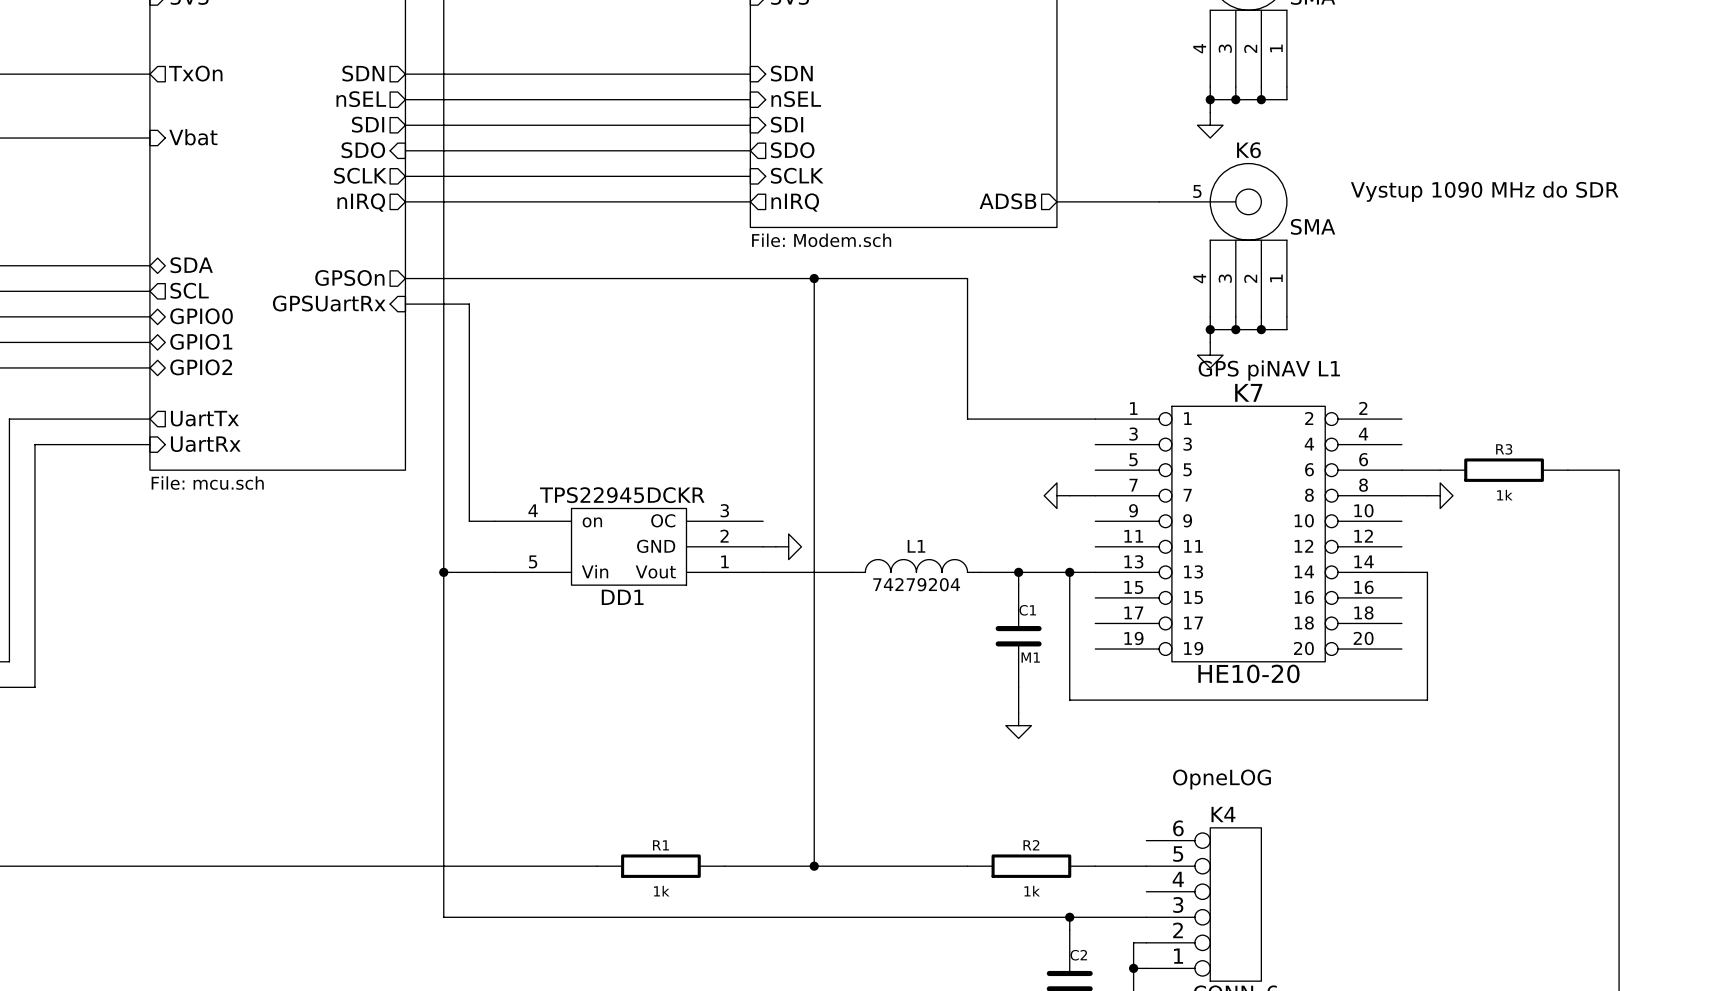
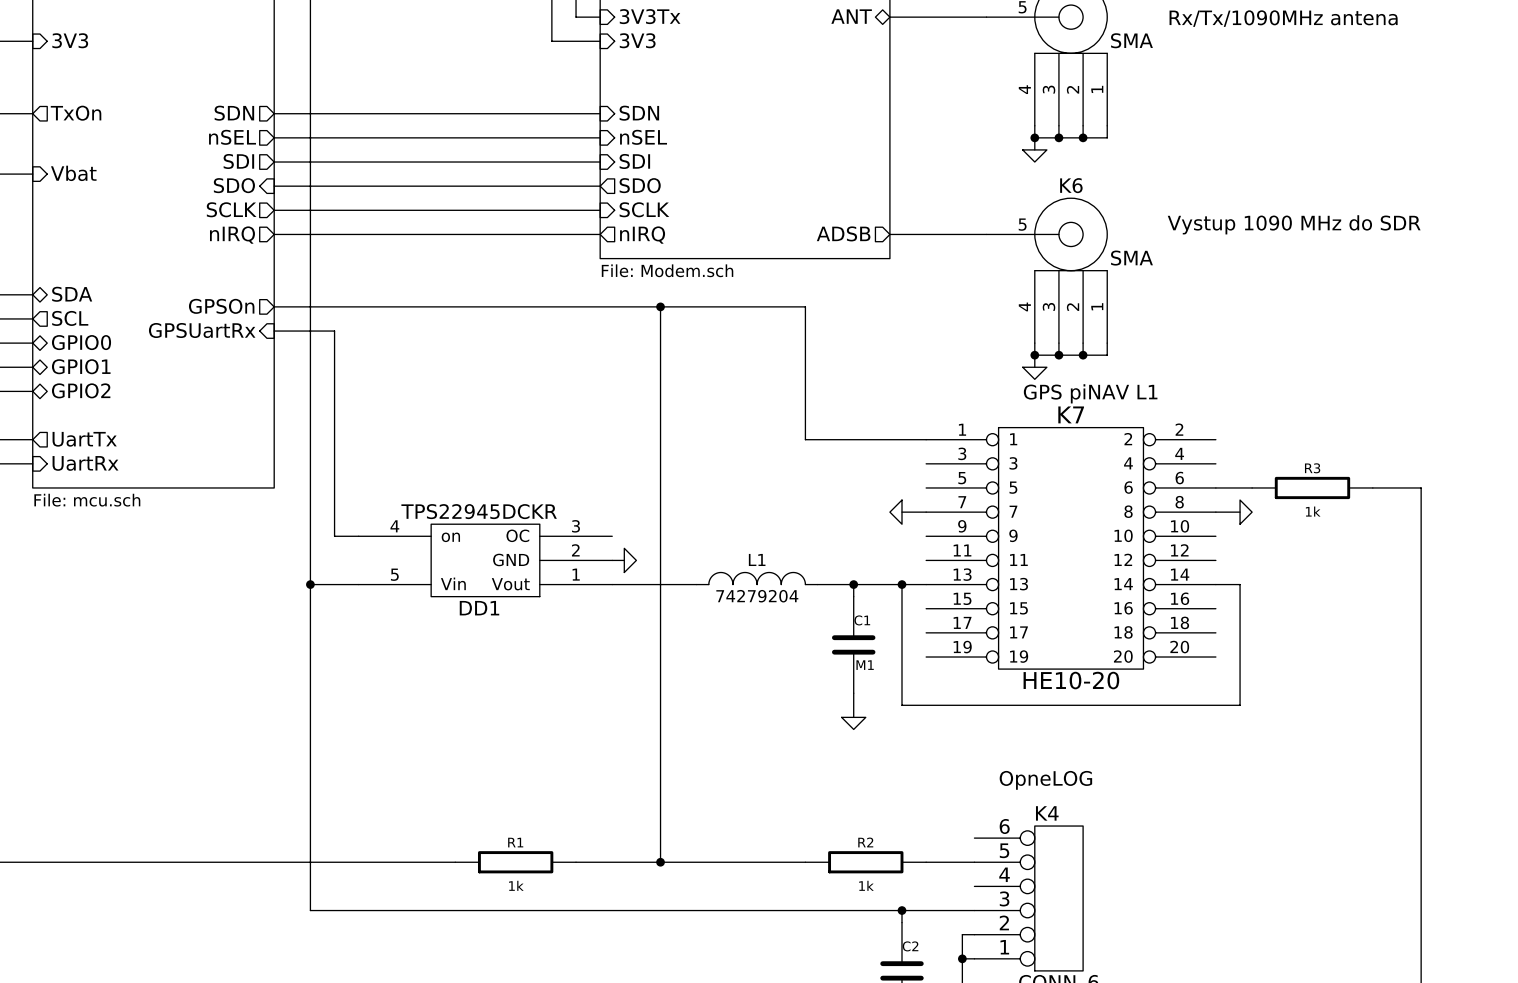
power symbol shape: [1197, 112, 1224, 139] -> [1022, 149, 1047, 163]
power symbol shape: [1197, 342, 1224, 368] -> [1022, 367, 1047, 380]
power symbol shape: [1044, 482, 1070, 509] -> [889, 500, 902, 525]
power symbol shape: [1427, 482, 1453, 509] -> [1240, 500, 1253, 525]
power symbol shape: [775, 534, 802, 560] -> [624, 548, 637, 573]
power symbol shape: [1005, 712, 1032, 739] -> [841, 717, 866, 730]

